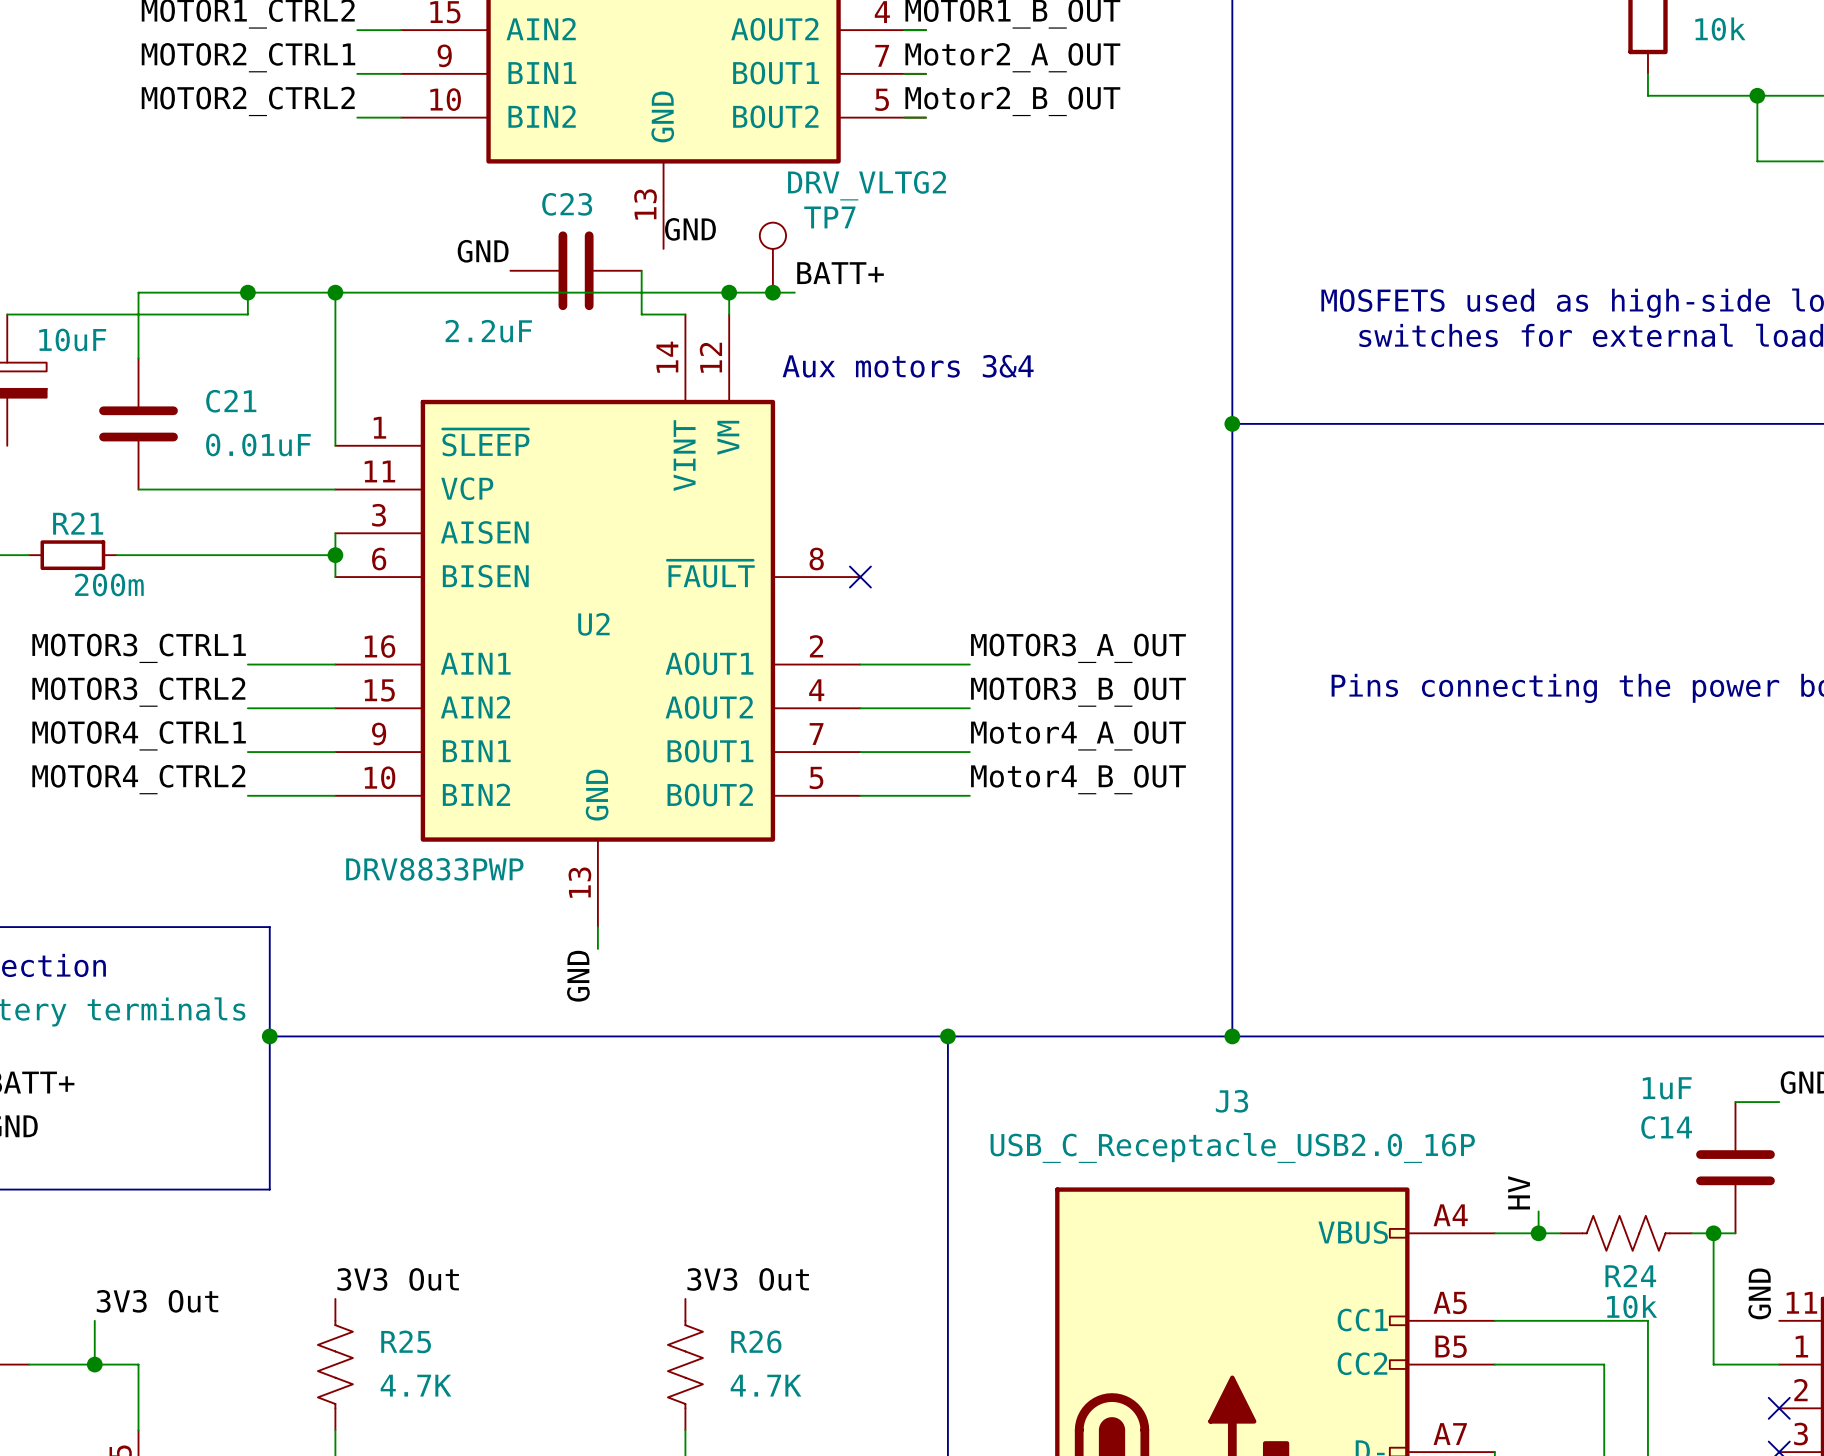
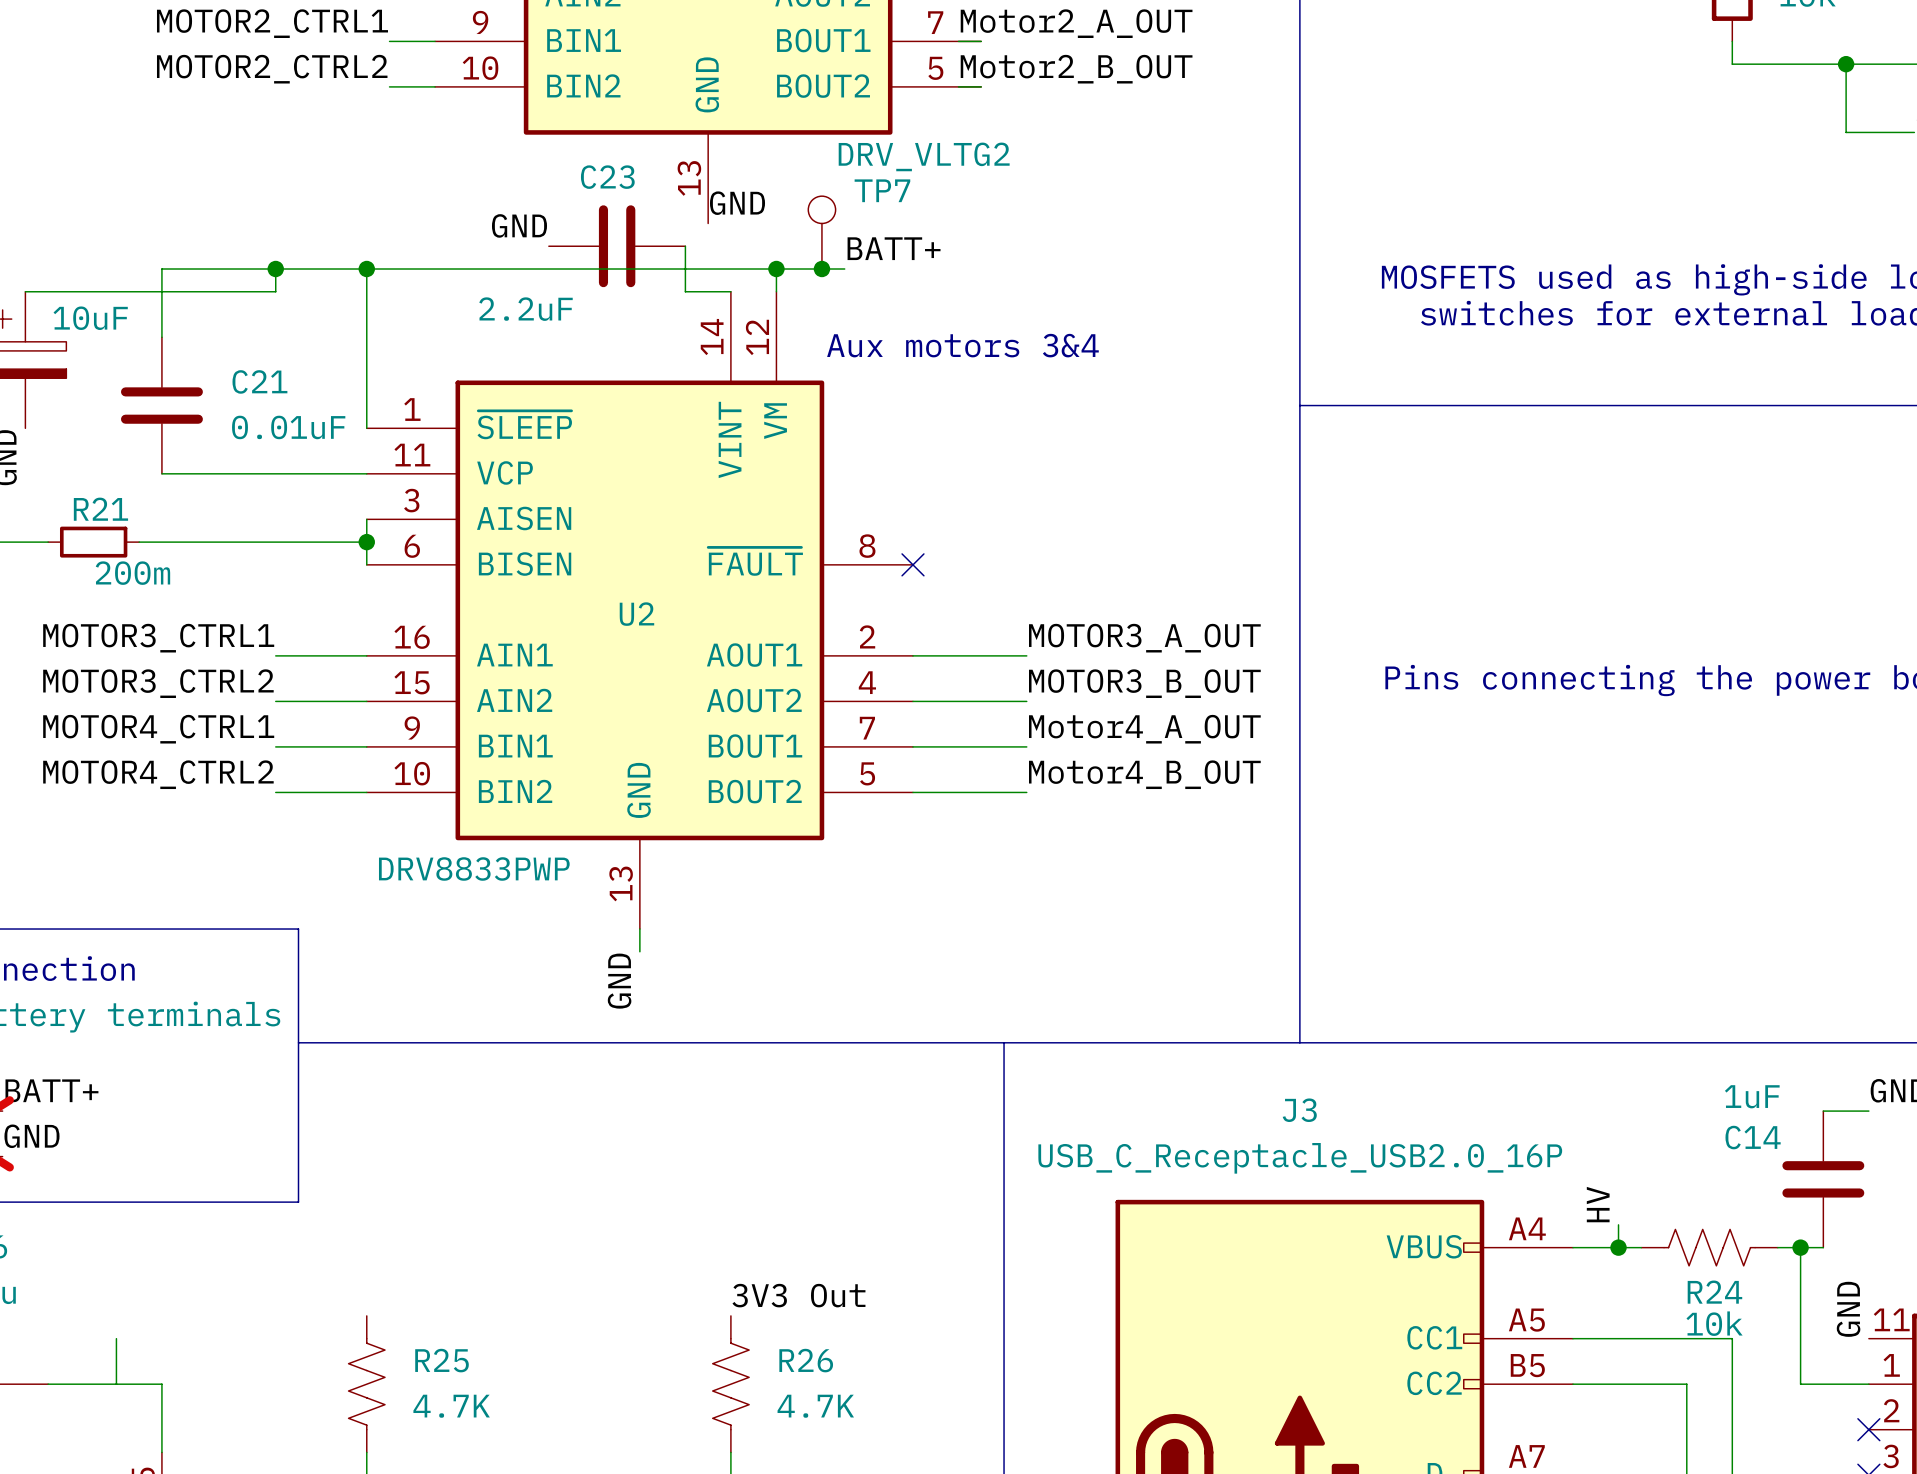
junction: (1232, 423) -> none
junction: (269, 1036) -> none
junction: (947, 1036) -> none
junction: (1232, 1036) -> none
label: 3V3 Out (398, 1279) -> none
label: 3V3 Out (157, 1301) -> none
junction: (94, 1364) -> none

